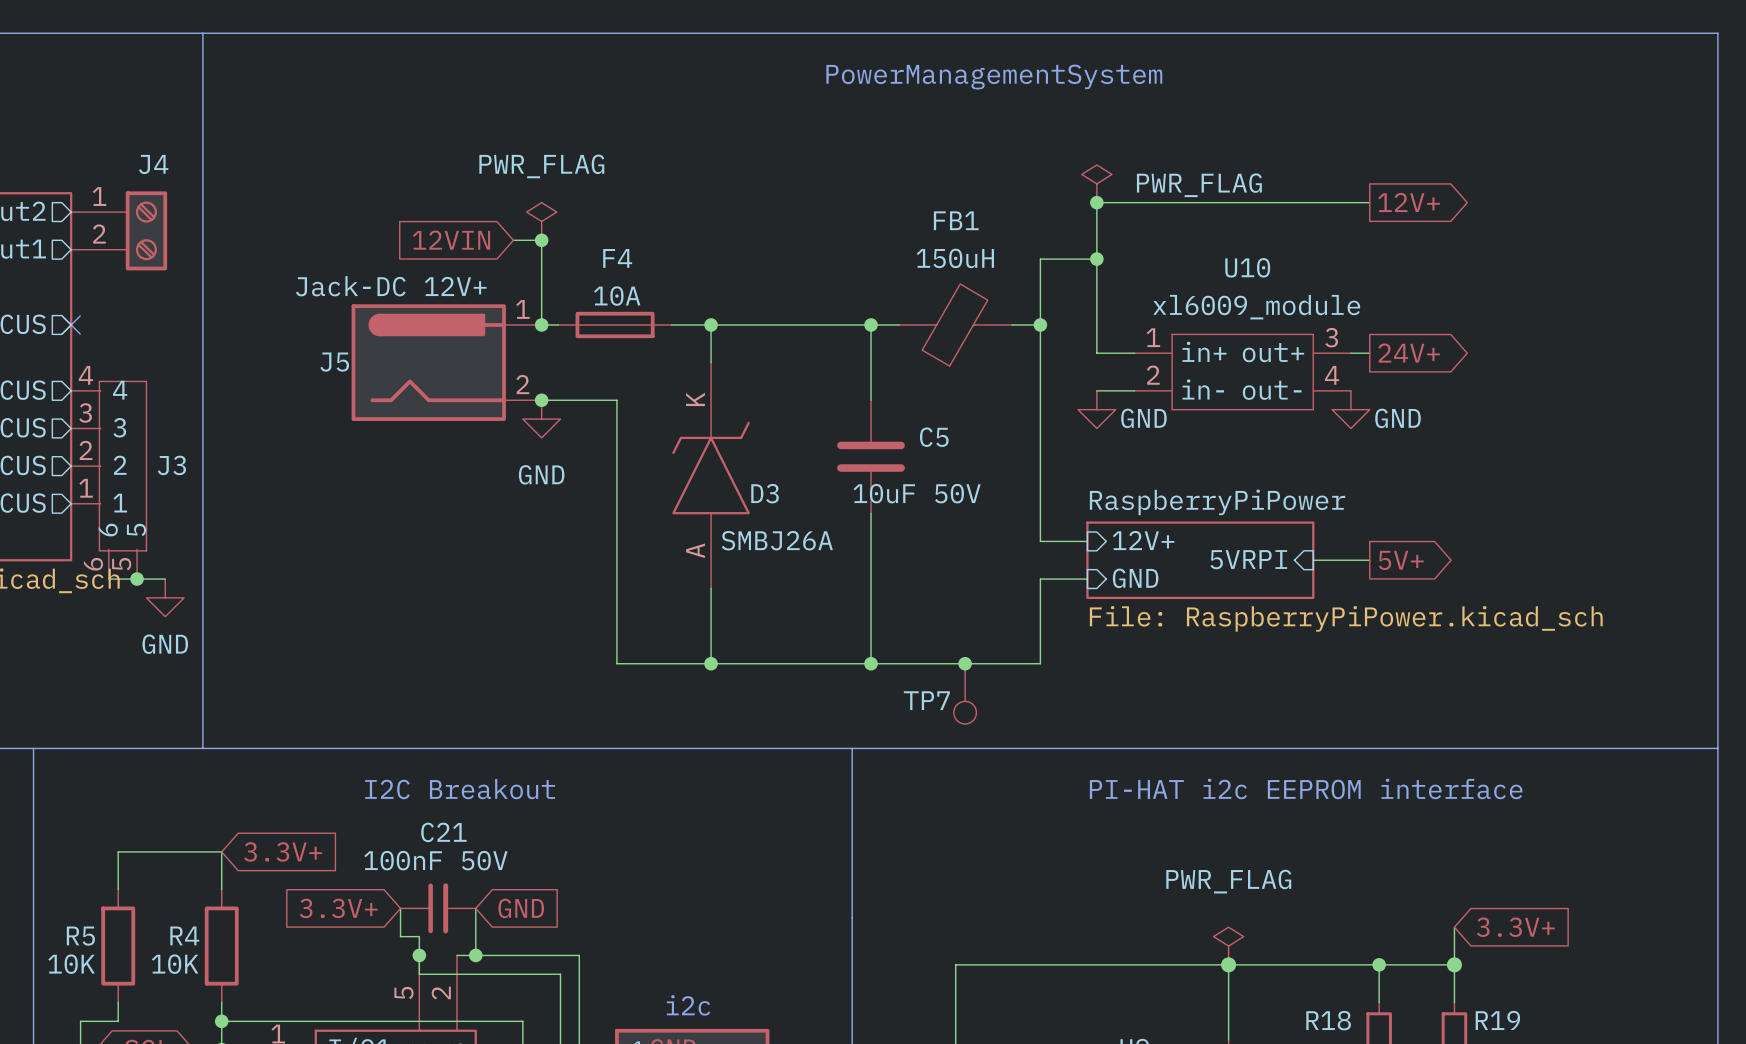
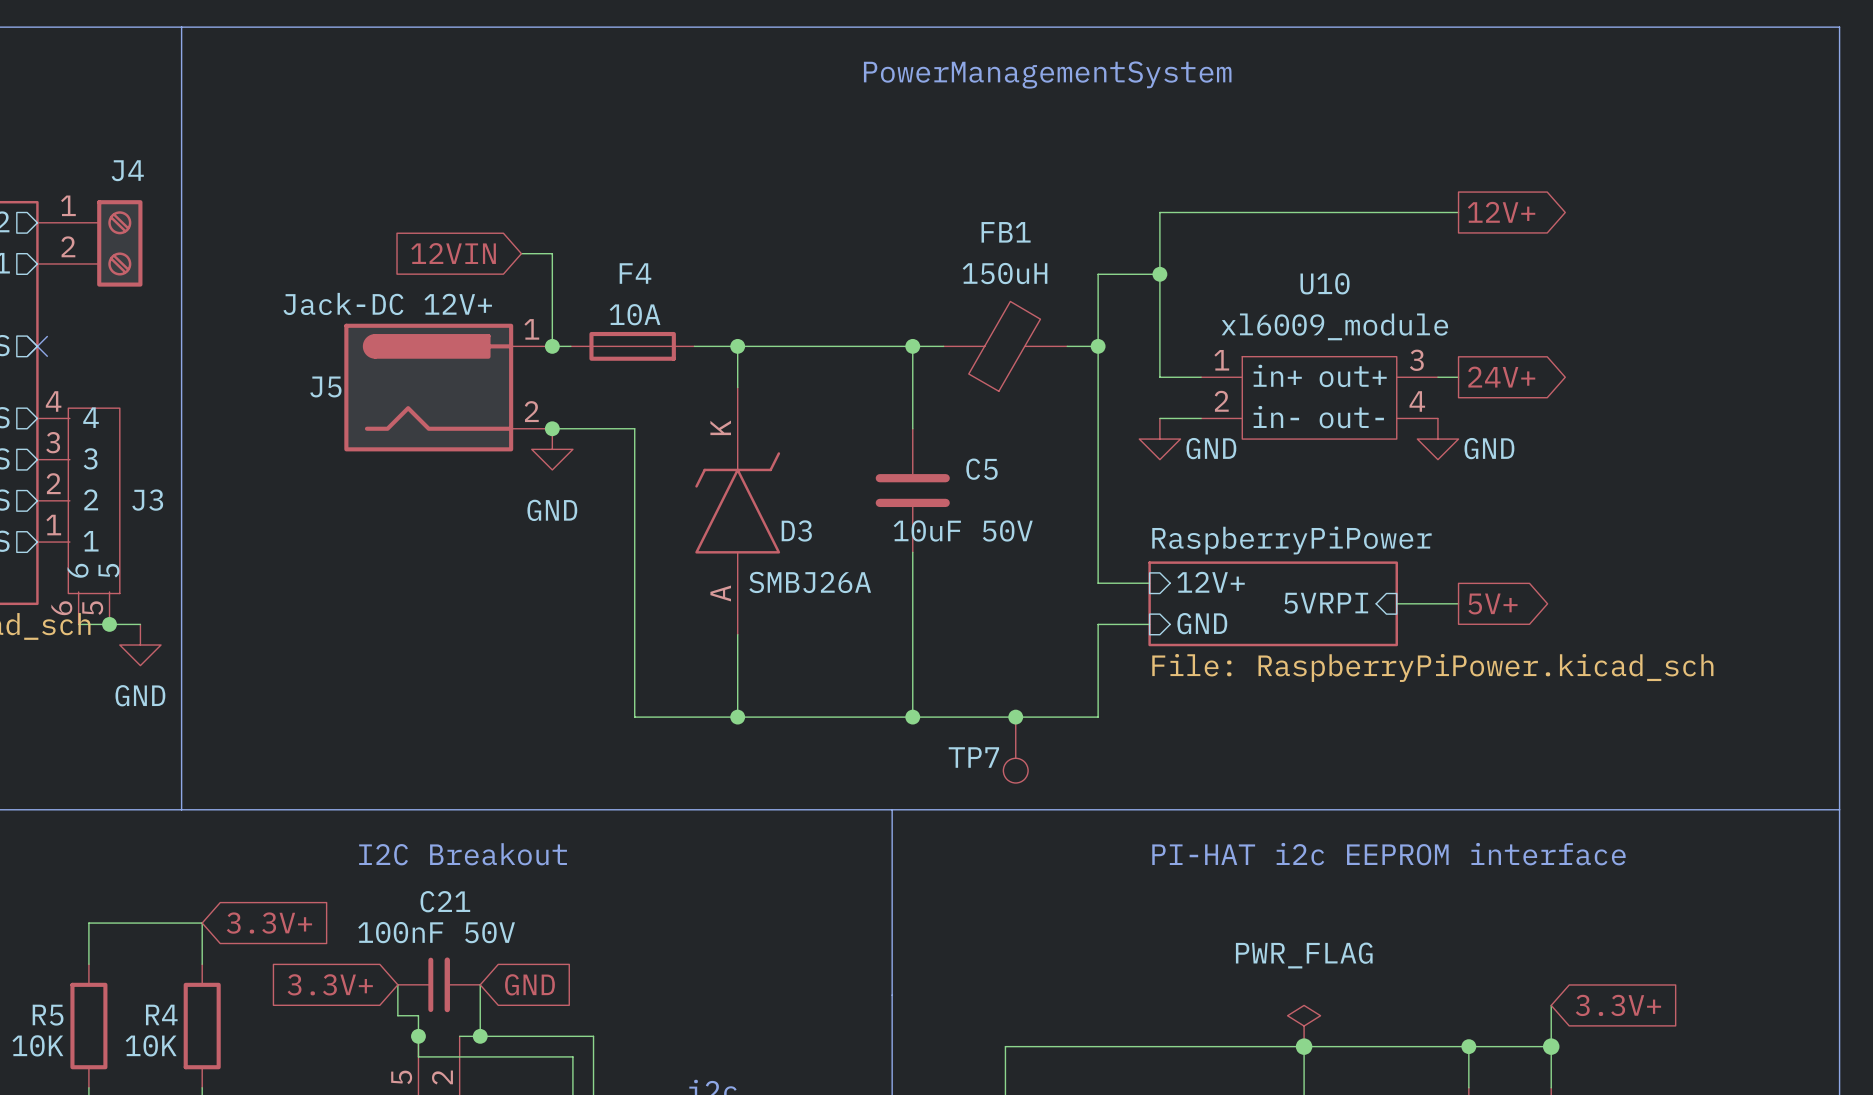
power symbol: PWR_FLAG (1096, 183) -> none
junction: (1096, 202) -> none
power symbol: PWR_FLAG (541, 221) -> none
junction: (541, 240) -> none

